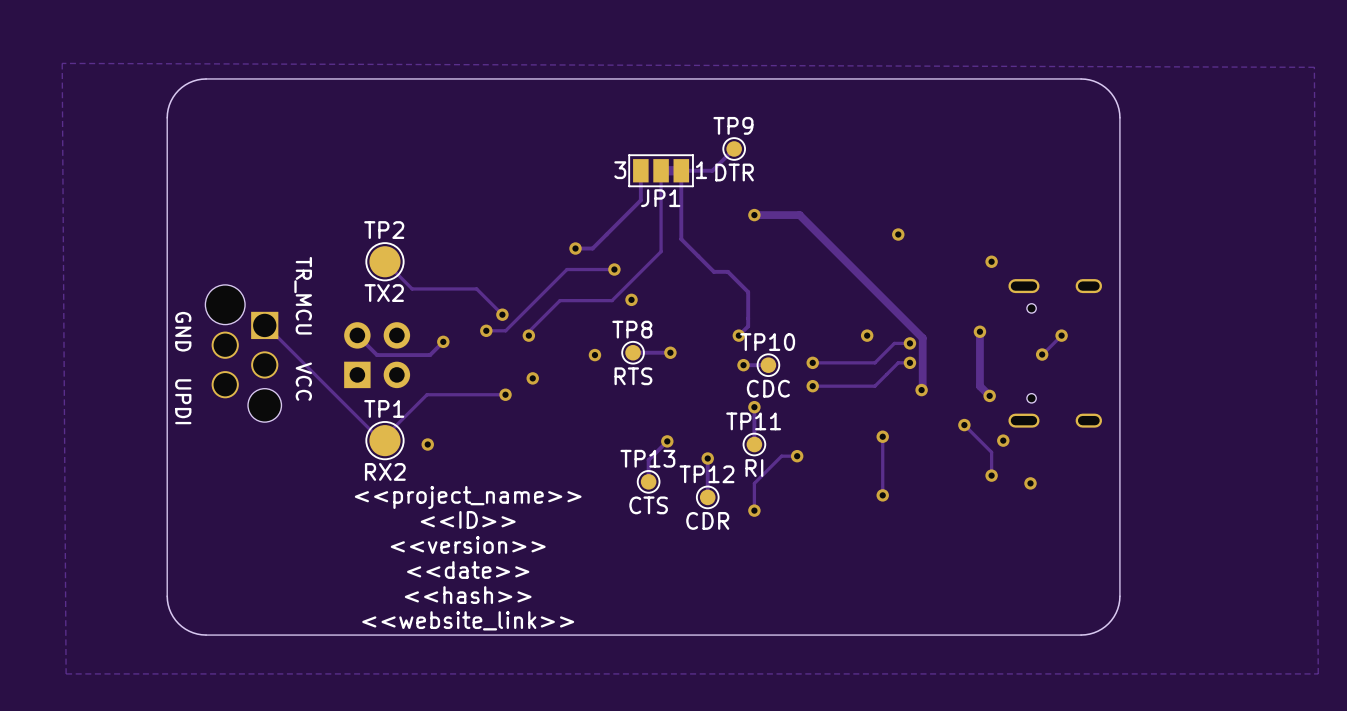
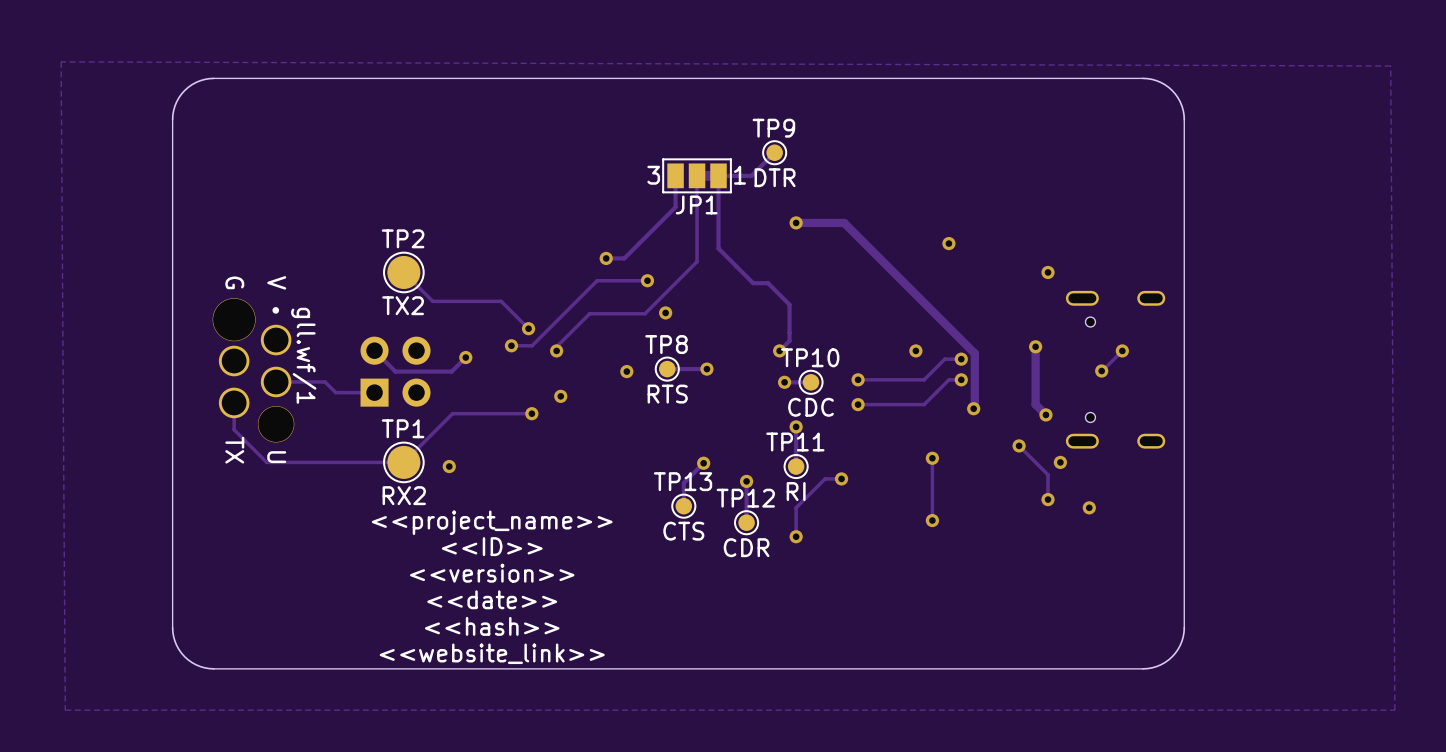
part footprint: [205, 284, 282, 423] -> [212, 298, 295, 443]
text: TR_MCU (303, 295) -> none
track: (265, 325) (381, 440) (426, 394) (430, 394) -> (234, 402) (234, 429) (266, 462) (403, 462) (452, 413)
text: GND (183, 331) -> none
track: none -> (276, 381) (325, 381) (335, 392) (374, 392)
text: VCC (303, 381) -> none
text: UPDI (183, 401) -> none

